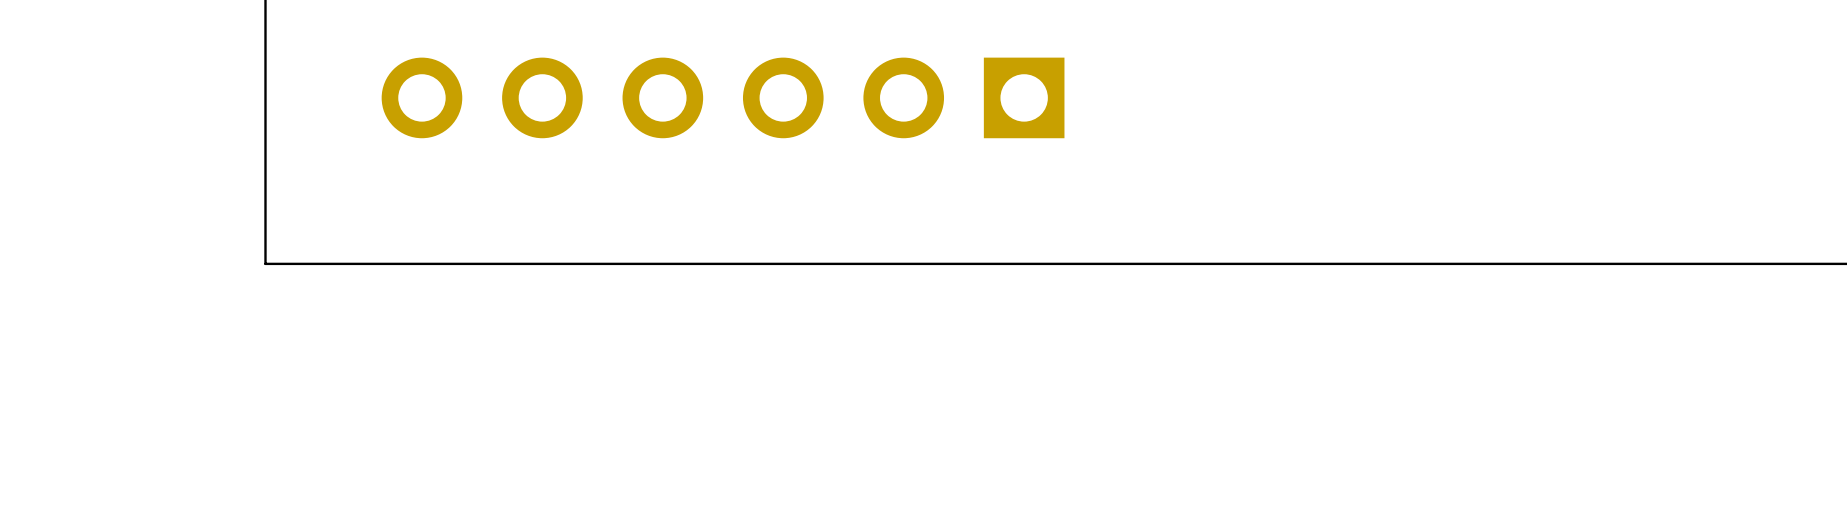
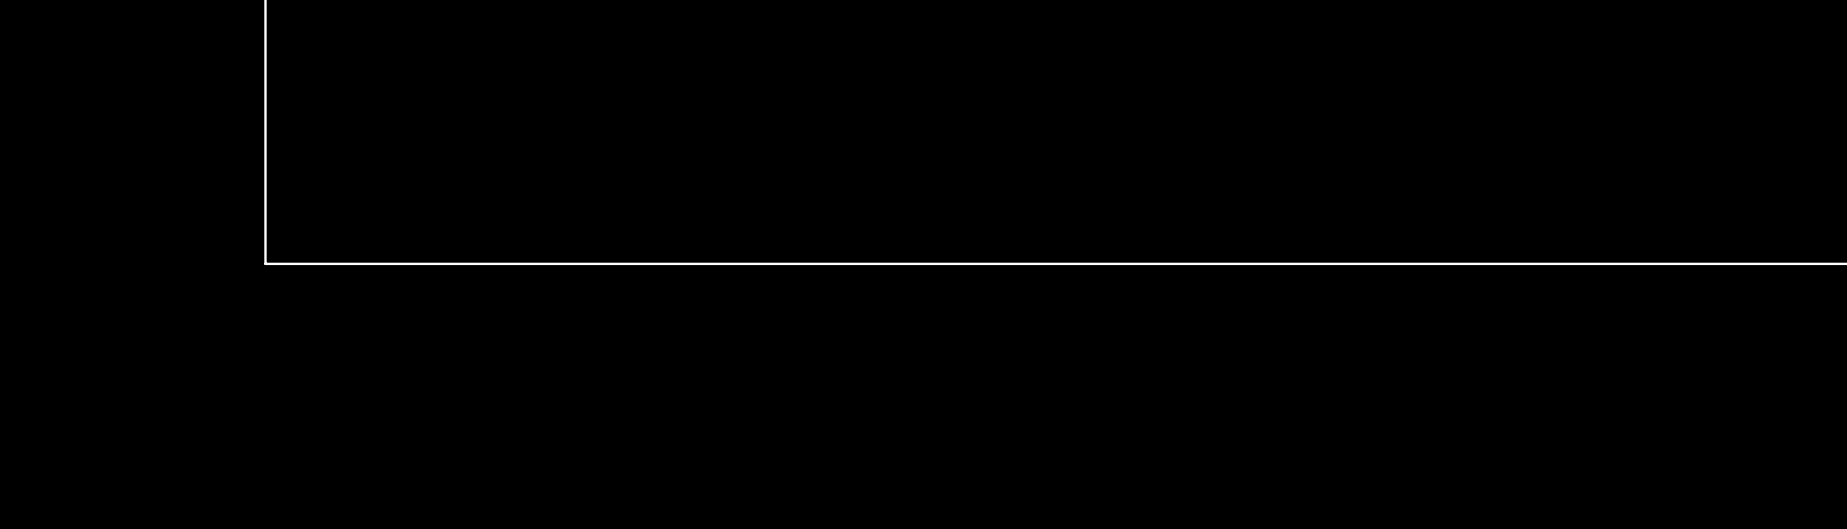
part: (723, 97) -> none

